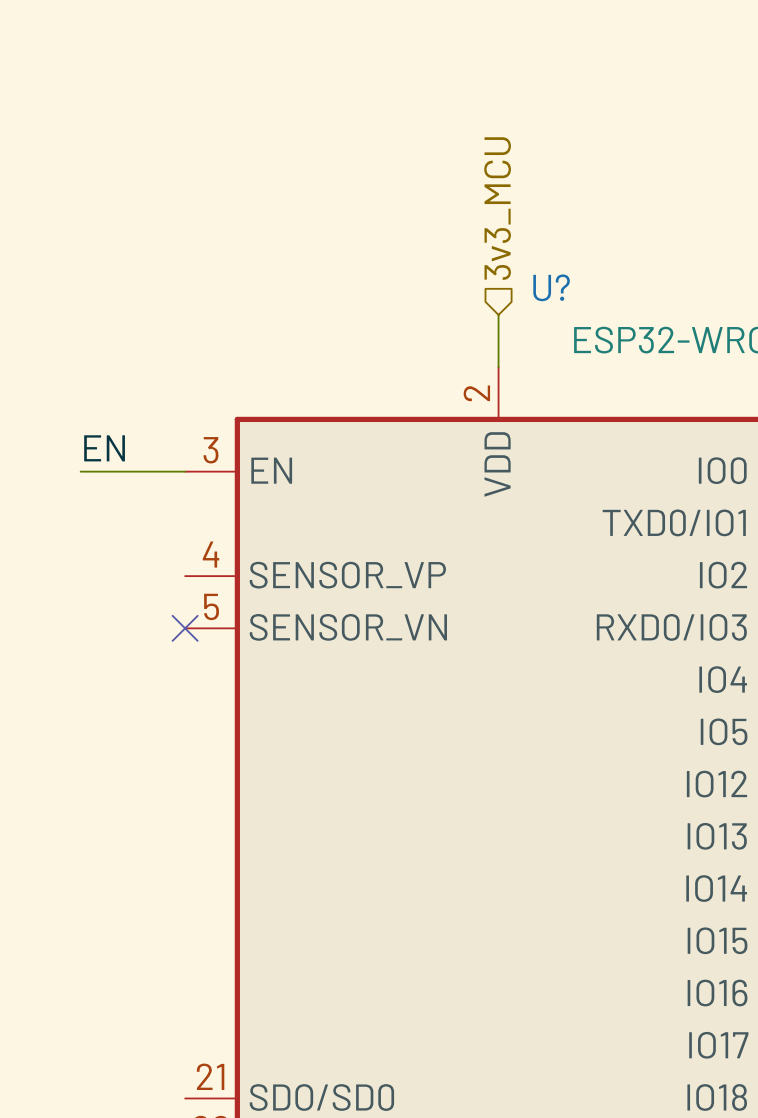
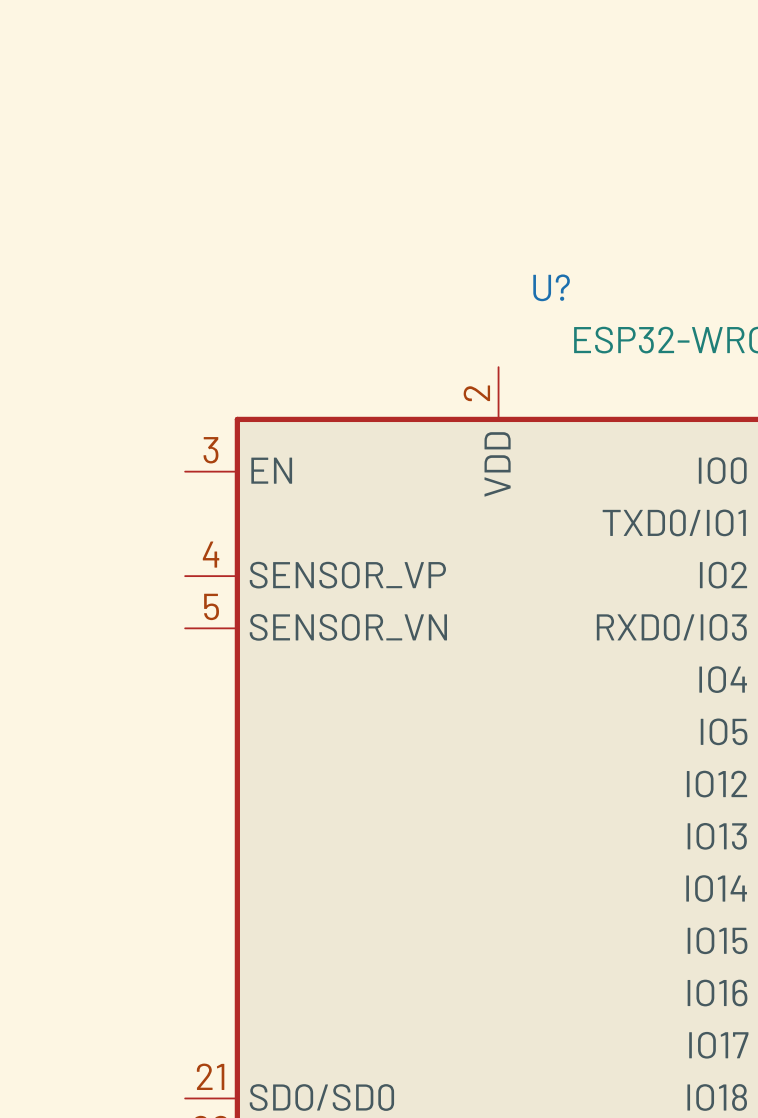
hierarchical label: 3v3_MCU (497, 208) -> none
wire: (498, 314) (498, 367) -> none
label: EN (104, 448) -> none
wire: (80, 471) (185, 471) -> none
no-connect mark: (185, 628) -> none

